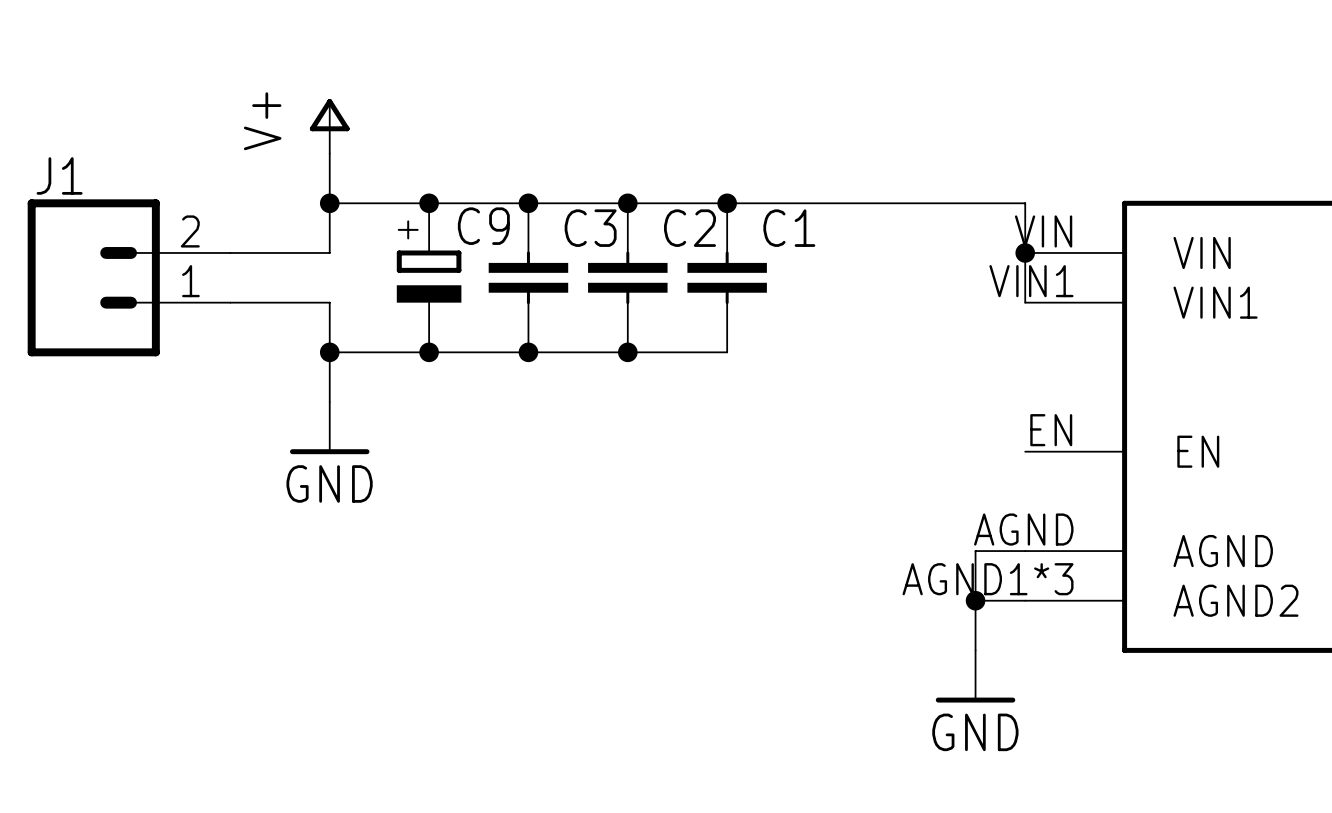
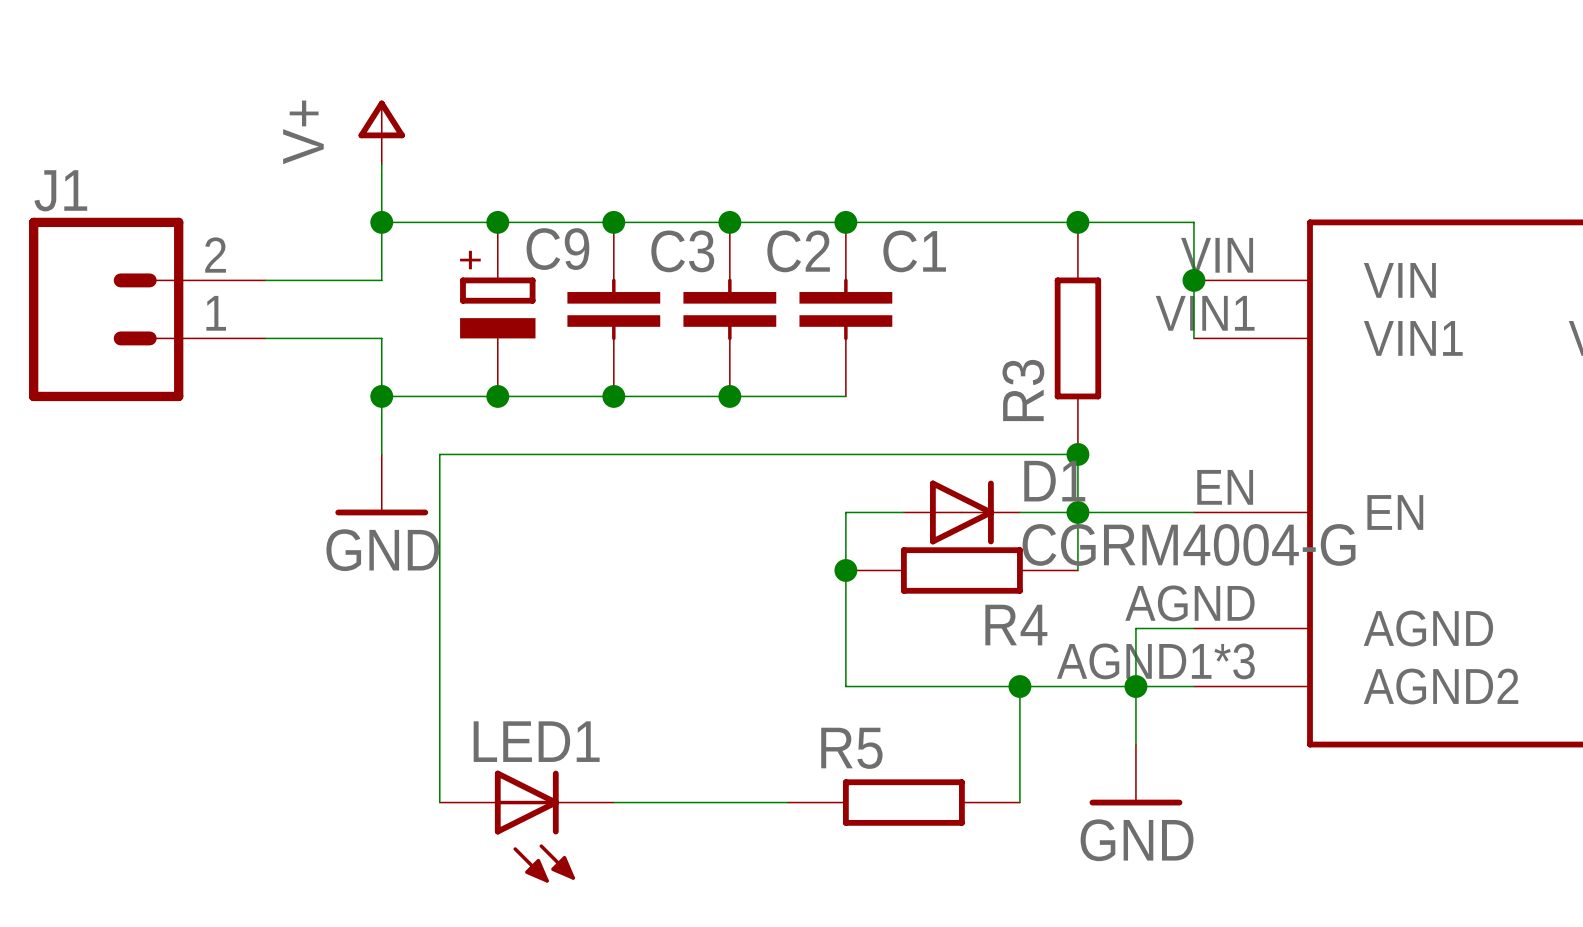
junction: none -> (1077, 222)
R3: none -> (1077, 338)
junction: none -> (1077, 454)
wire: none -> (903, 512) (845, 512) (845, 686) (1135, 686)
D1: none -> CGRM4004-G (961, 512)
wire: none -> (1019, 512) (1193, 512)
junction: none -> (1077, 512)
junction: none -> (845, 570)
R4: none -> (961, 570)
wire: none -> (1077, 570) (1077, 454) (439, 454) (439, 802)
wire: none -> (1019, 686) (1019, 802)
junction: none -> (1019, 686)
wire: none -> (613, 802) (787, 802)
R5: none -> (903, 802)
LED1: none -> (526, 826)

